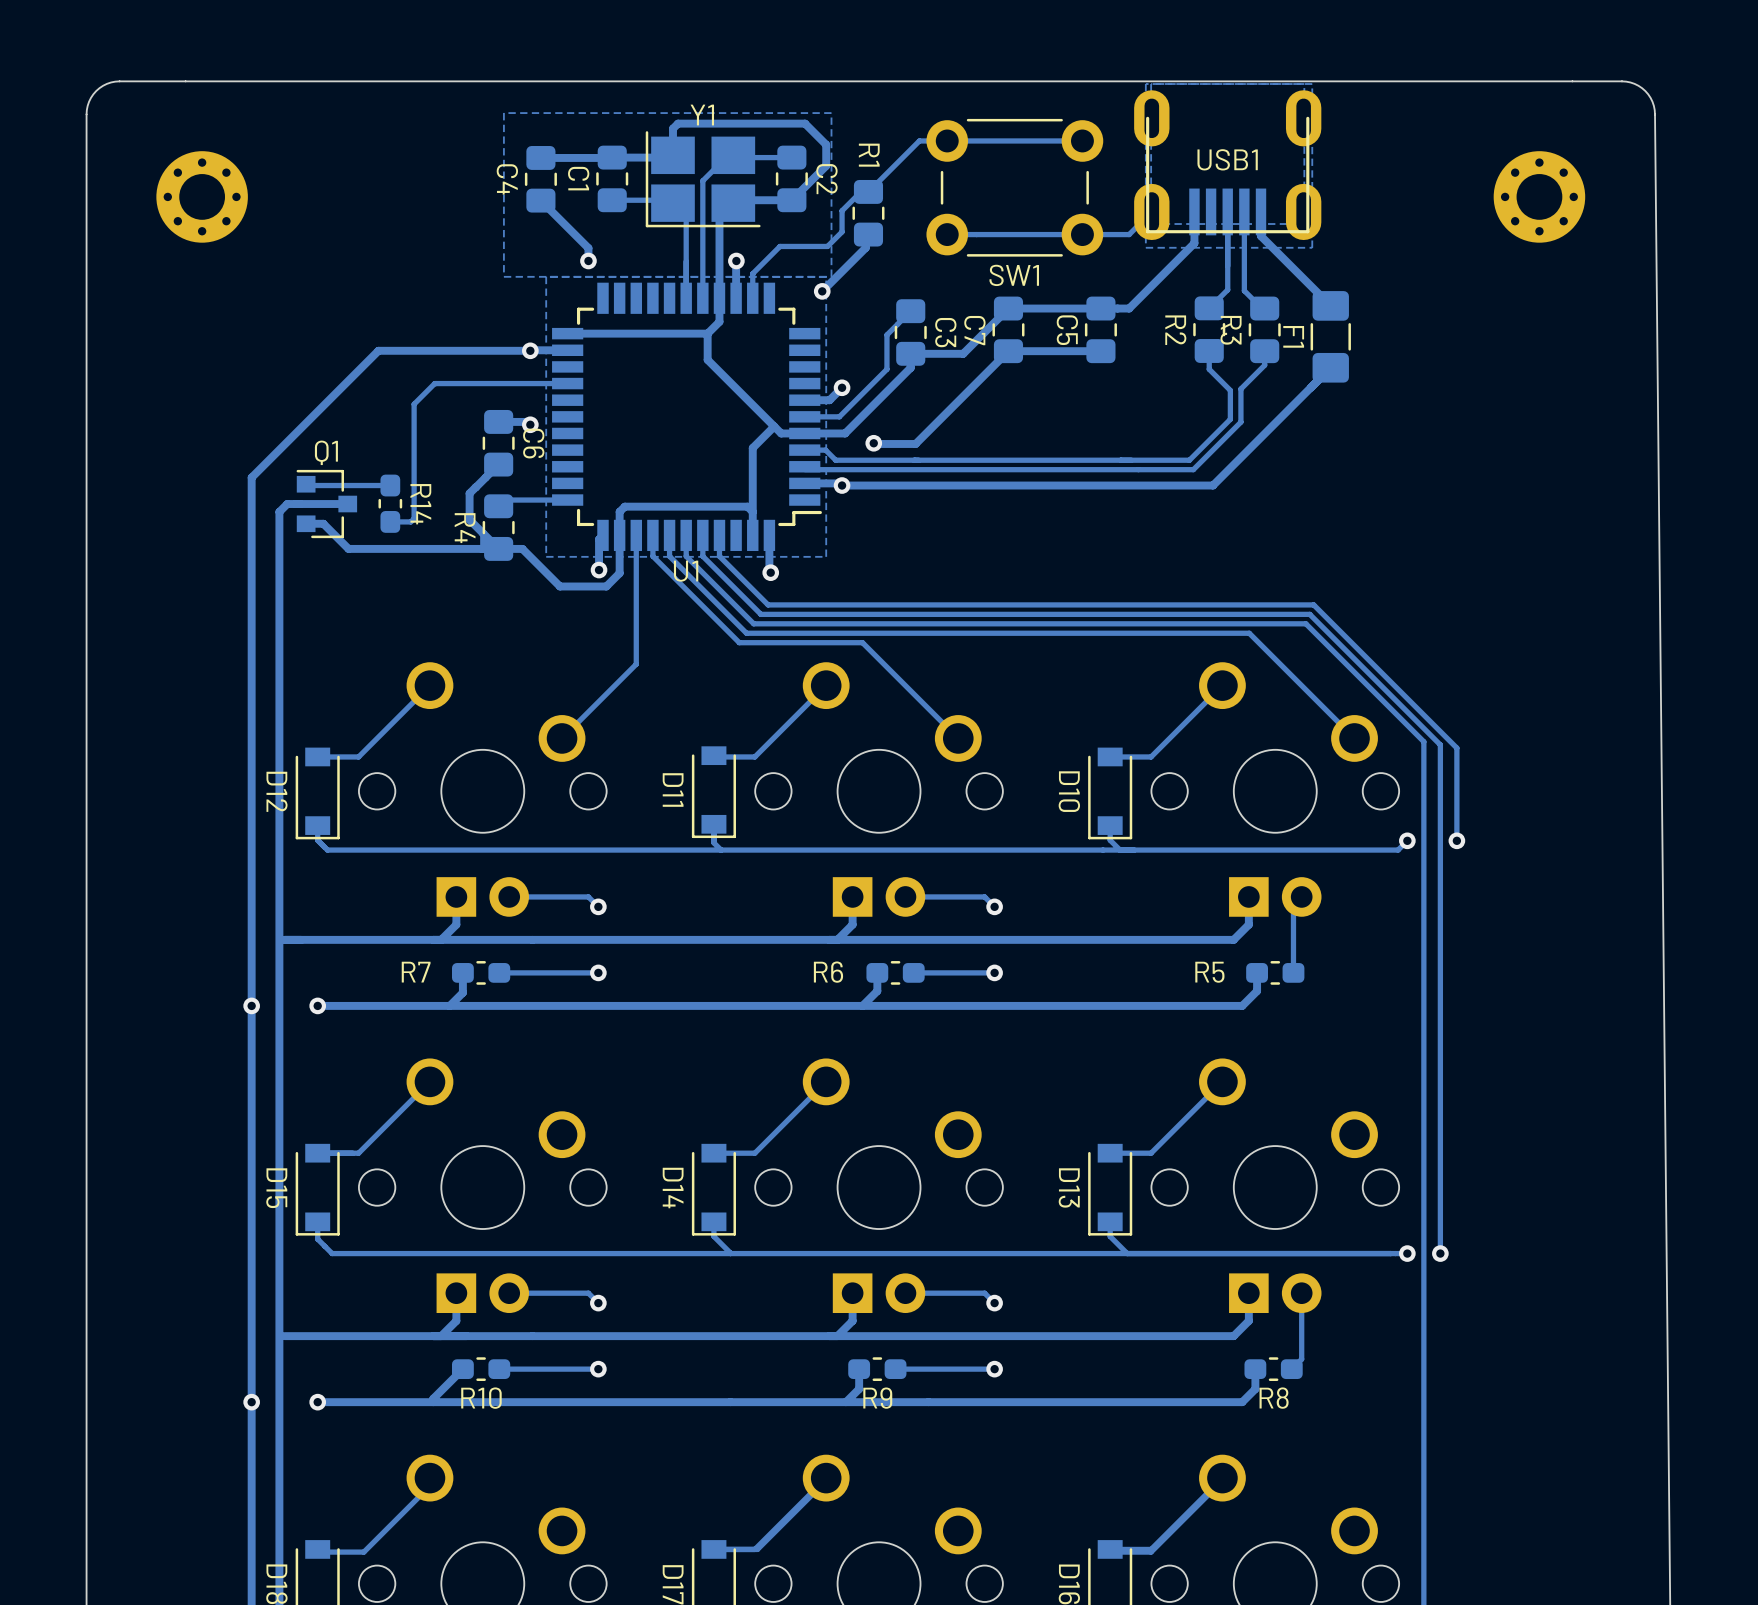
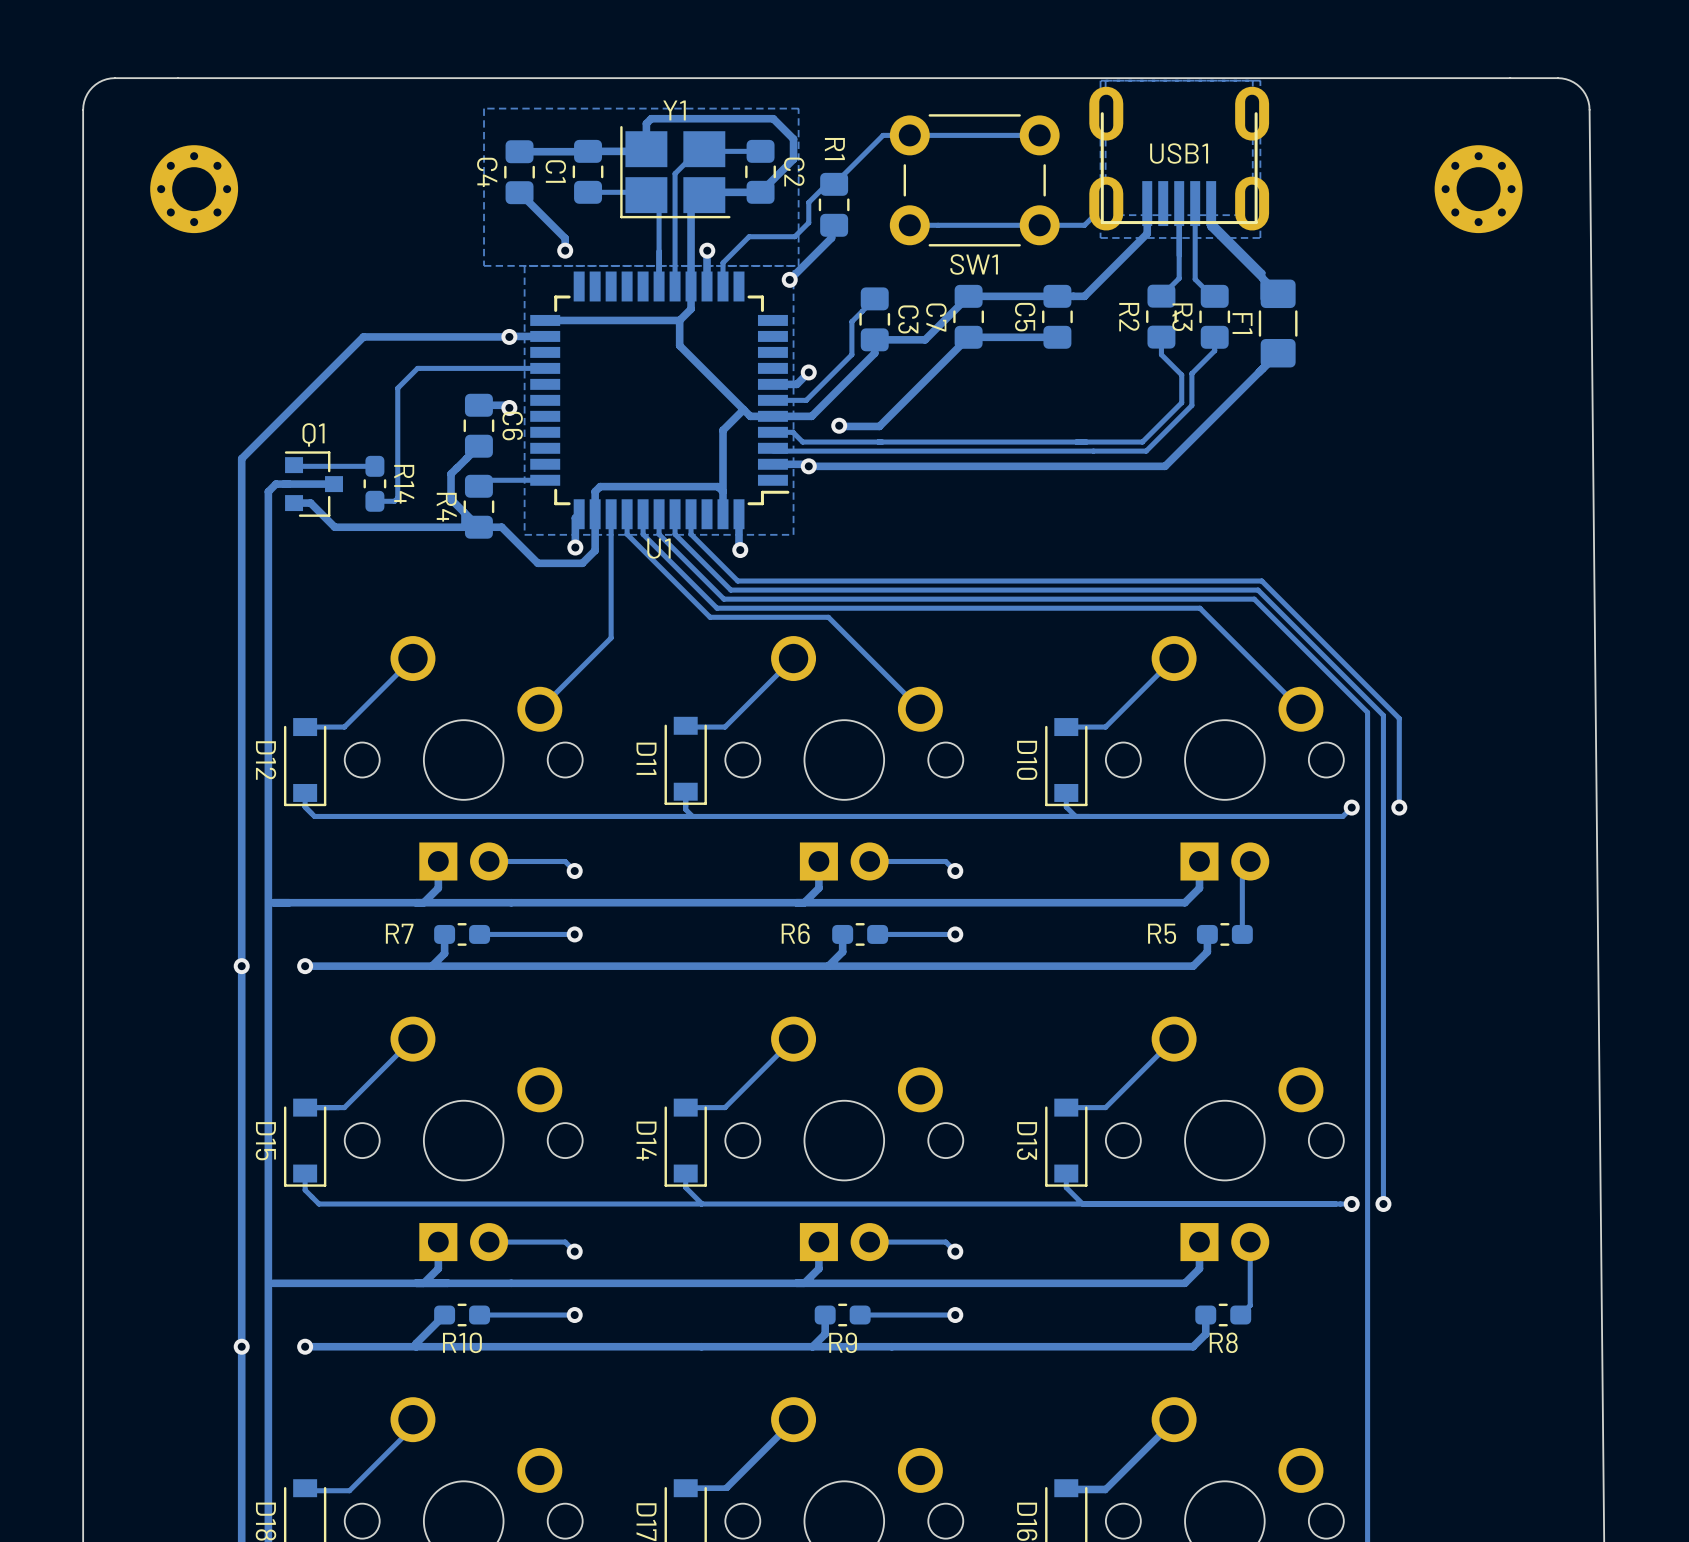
track: none -> (1211, 221) (1262, 272) (1262, 298)

